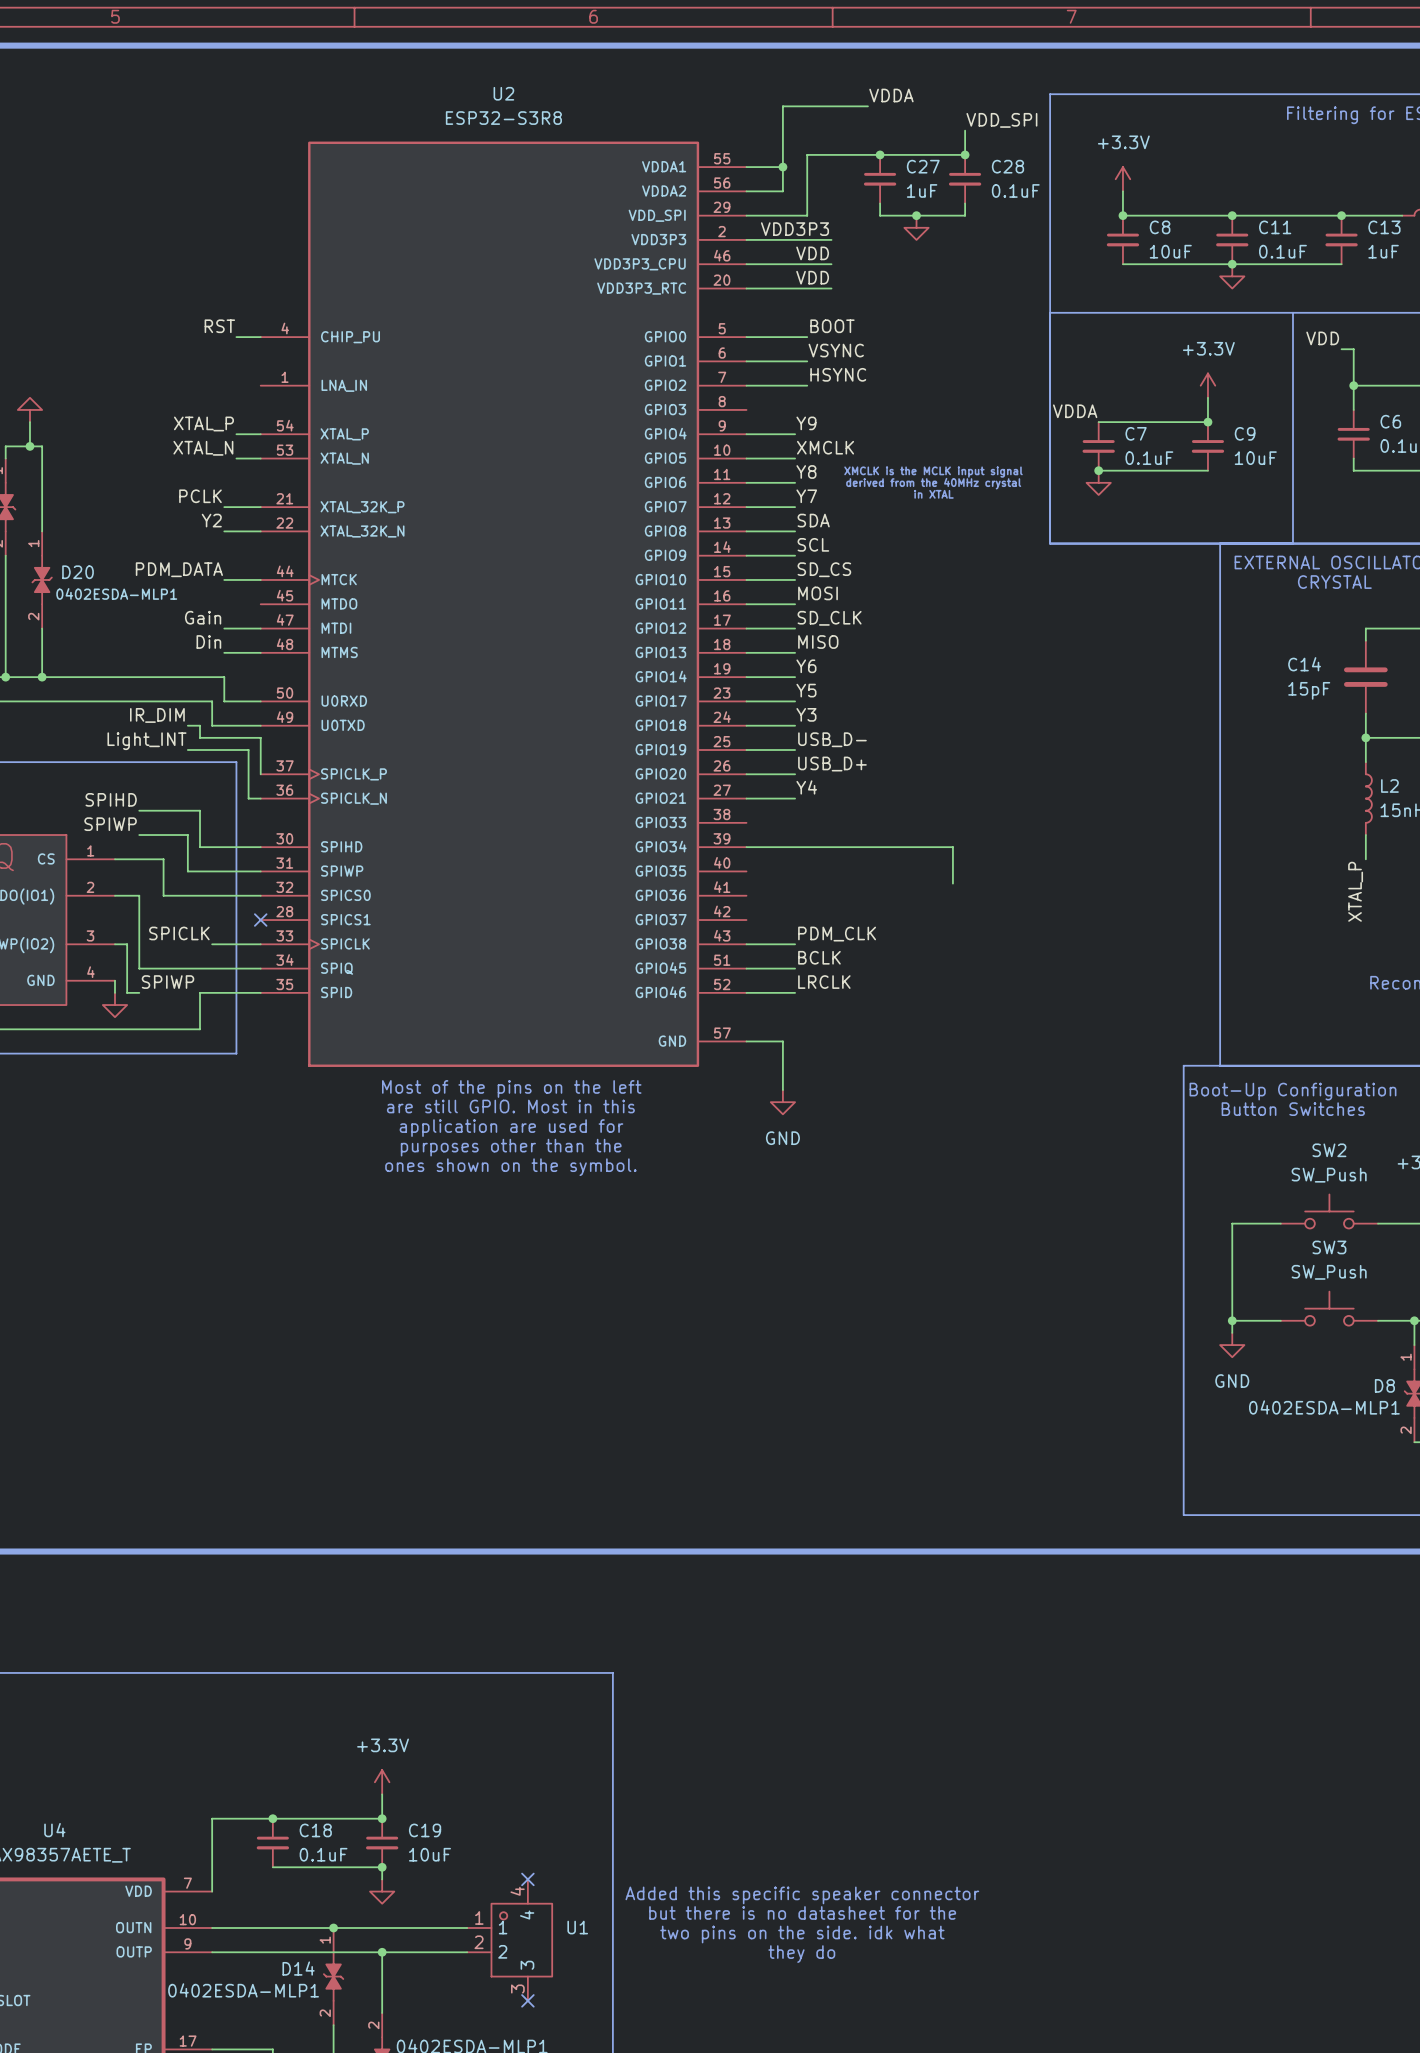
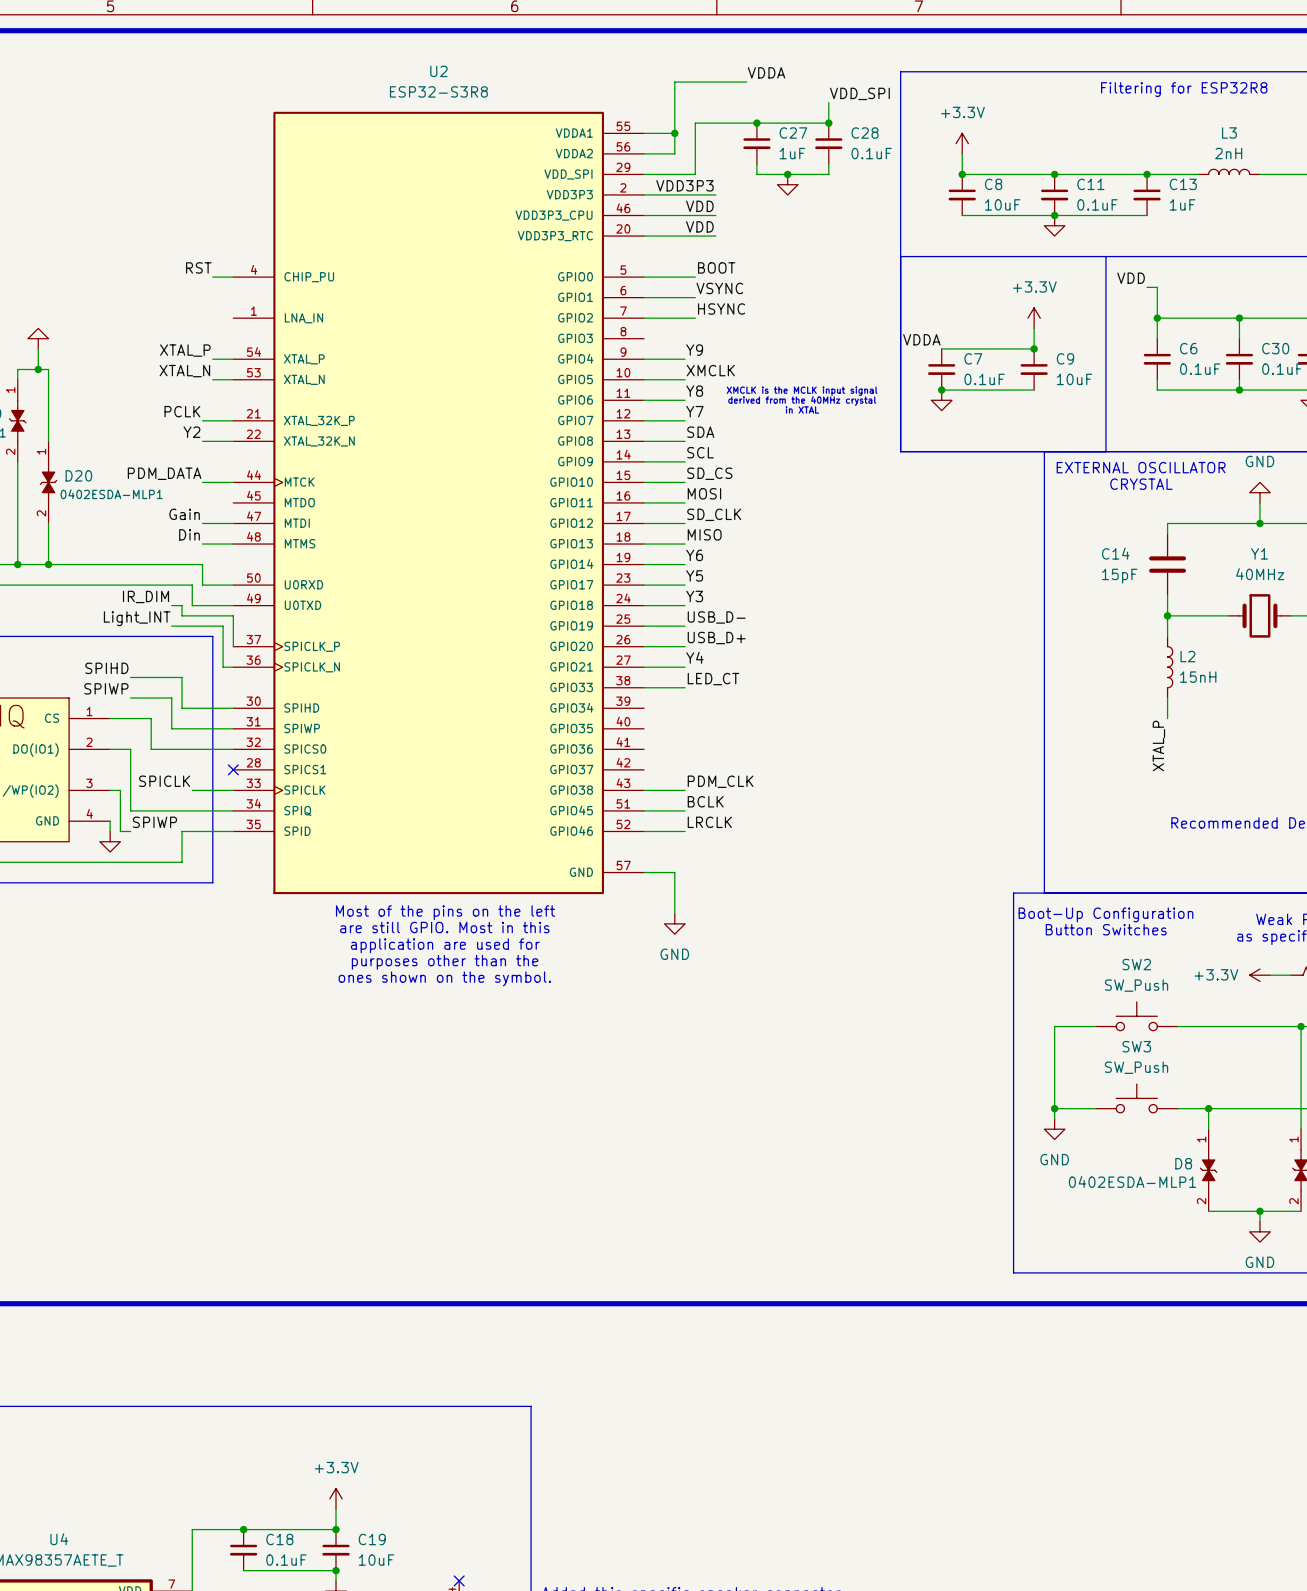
label: none -> LED_CT (713, 679)
wire: none -> (643, 687) (685, 687)
wire: (746, 847) (952, 847) (952, 883) -> none

